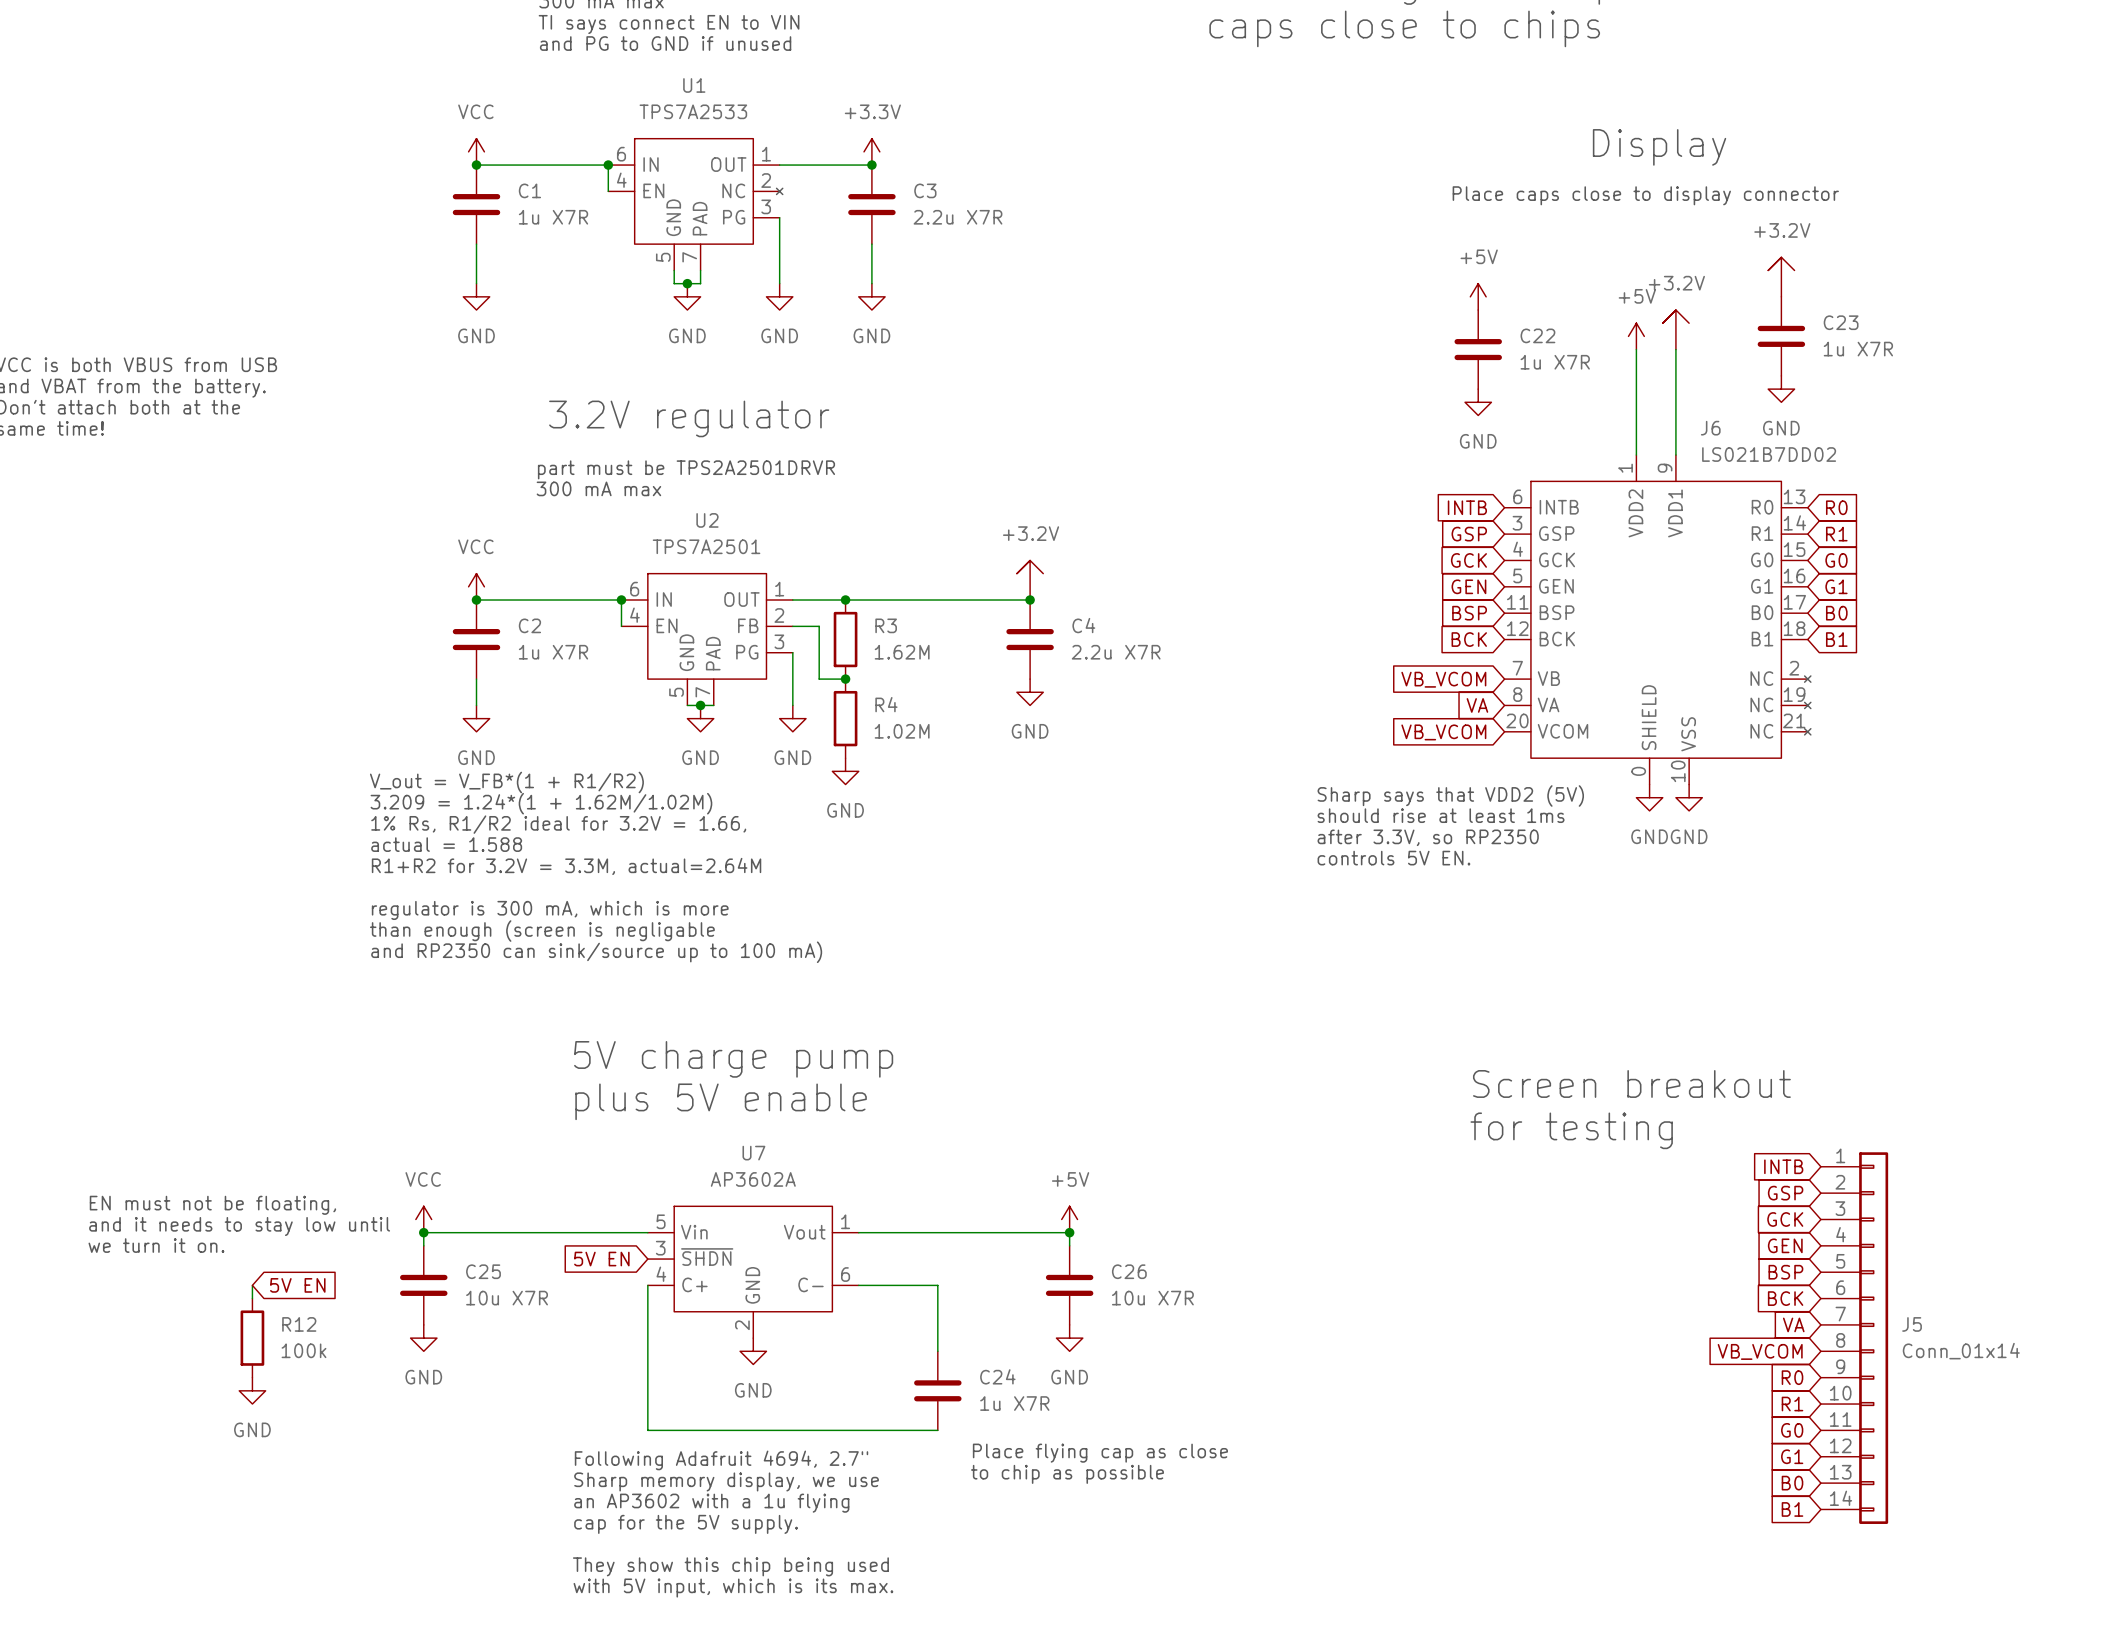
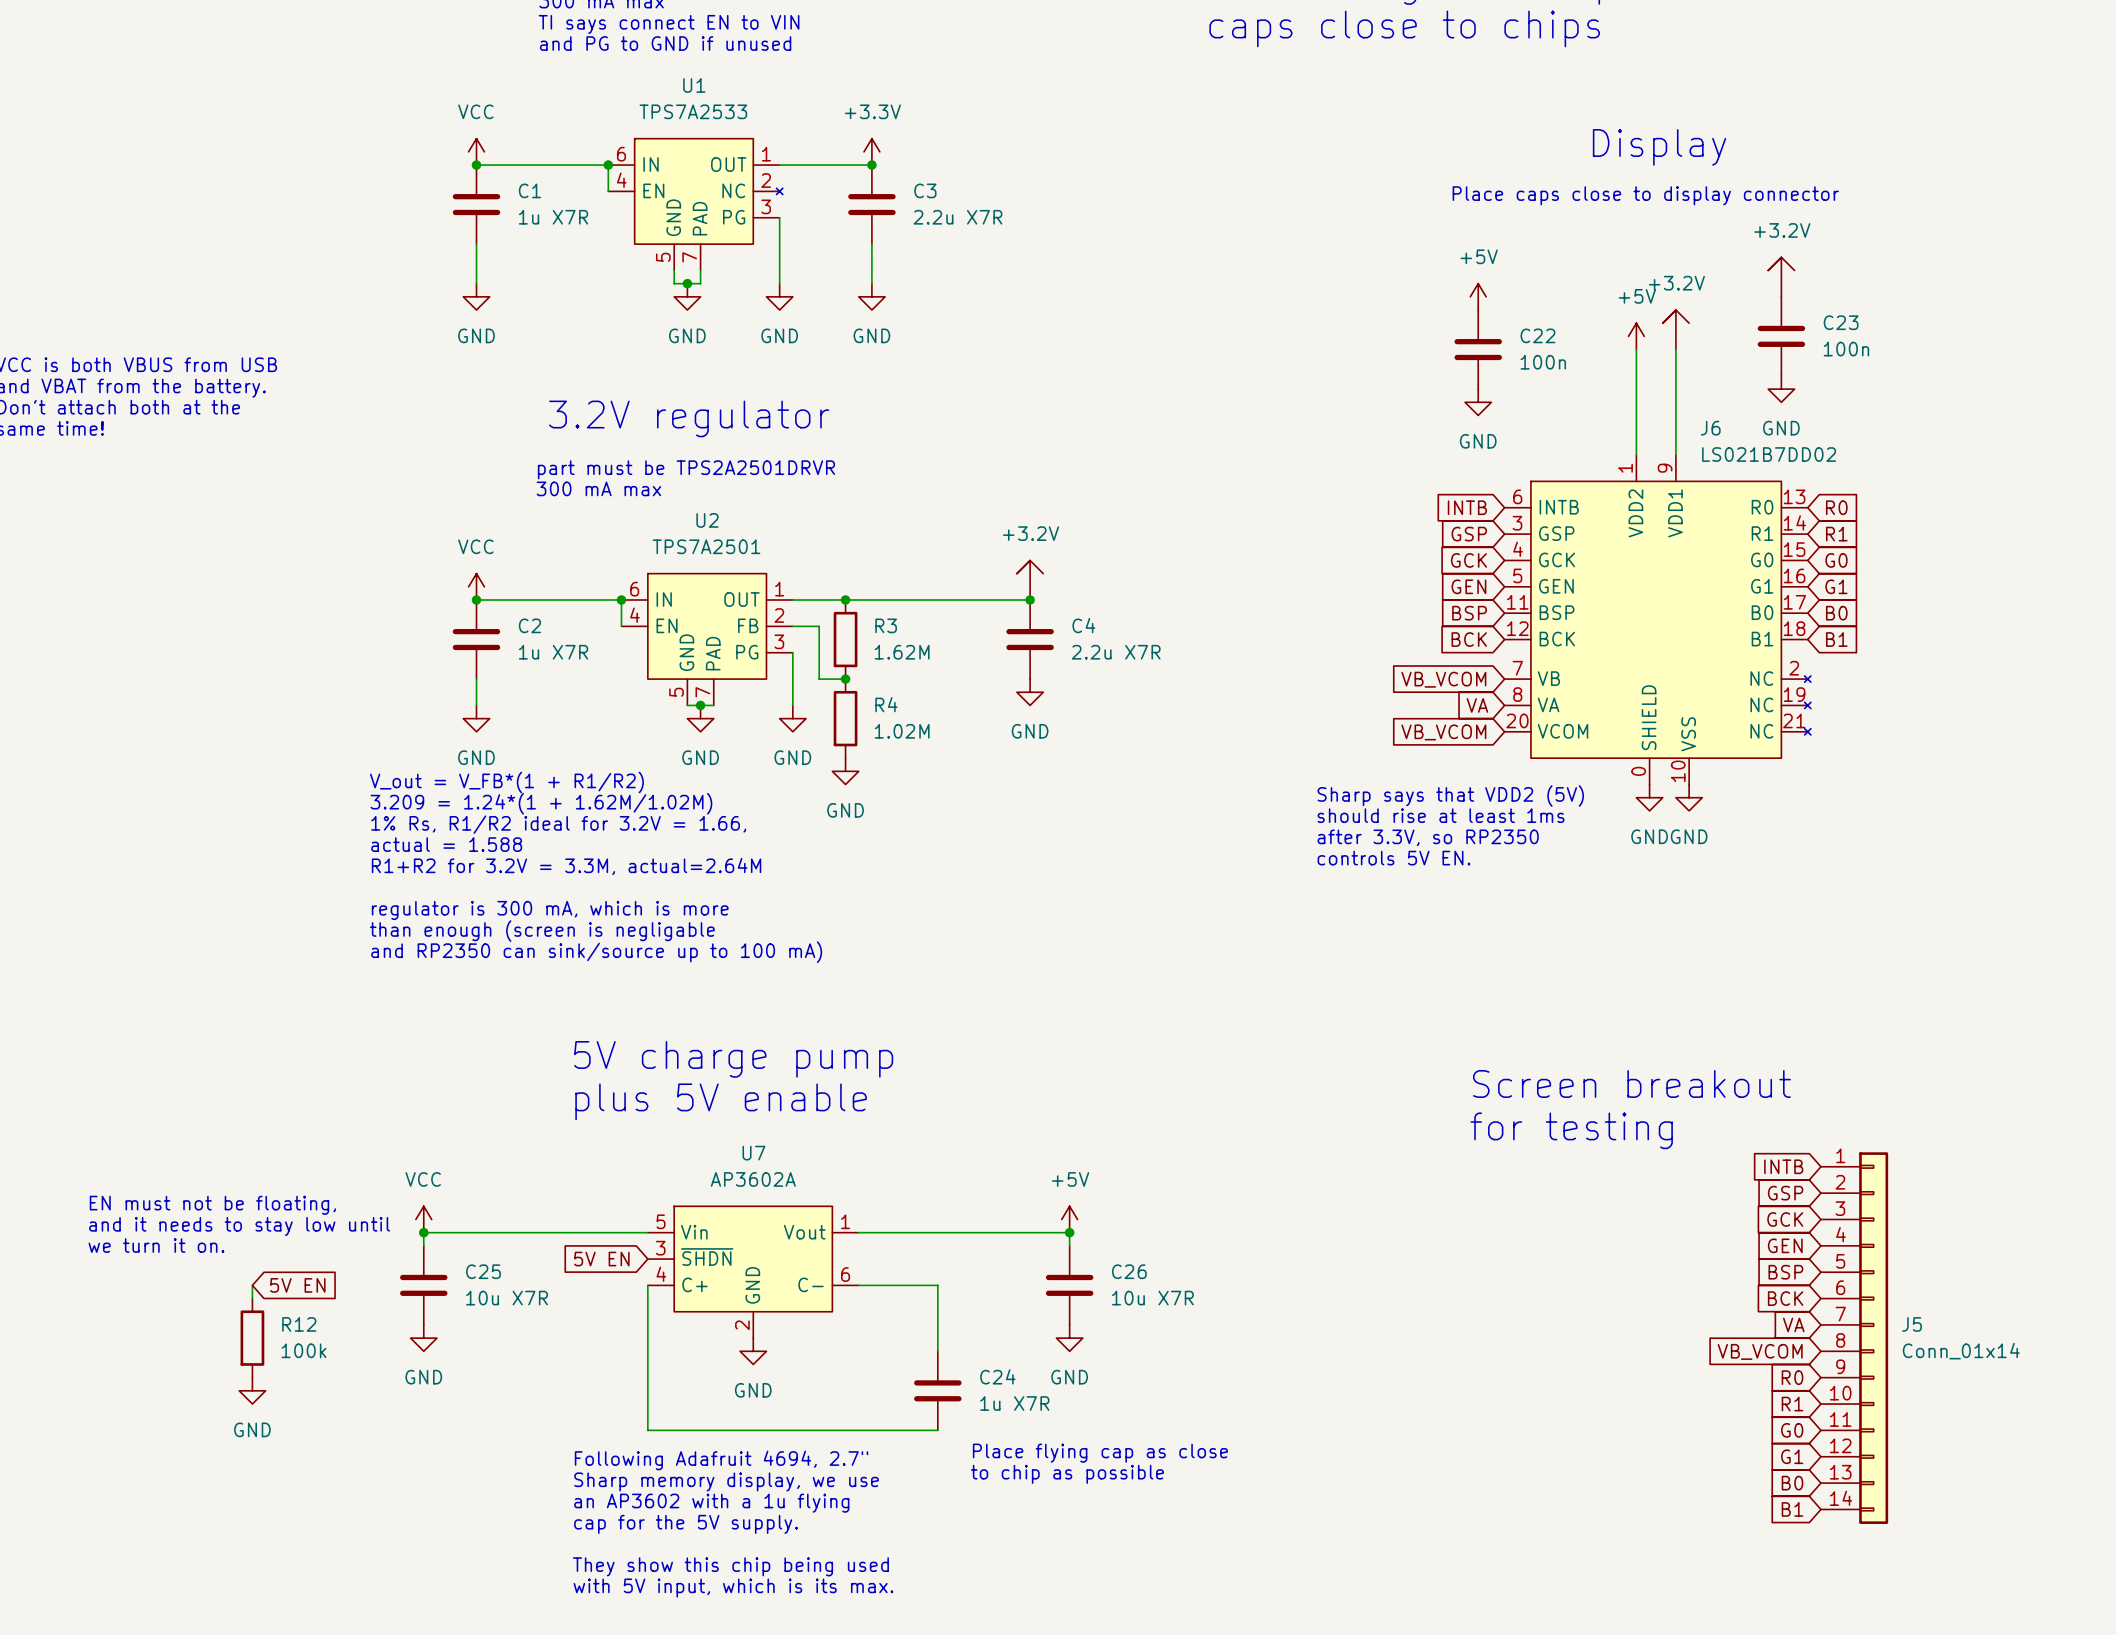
C23 value: 1u X7R (1858, 349) -> 100n (1846, 349)
C22 value: 1u X7R (1555, 362) -> 100n (1543, 362)

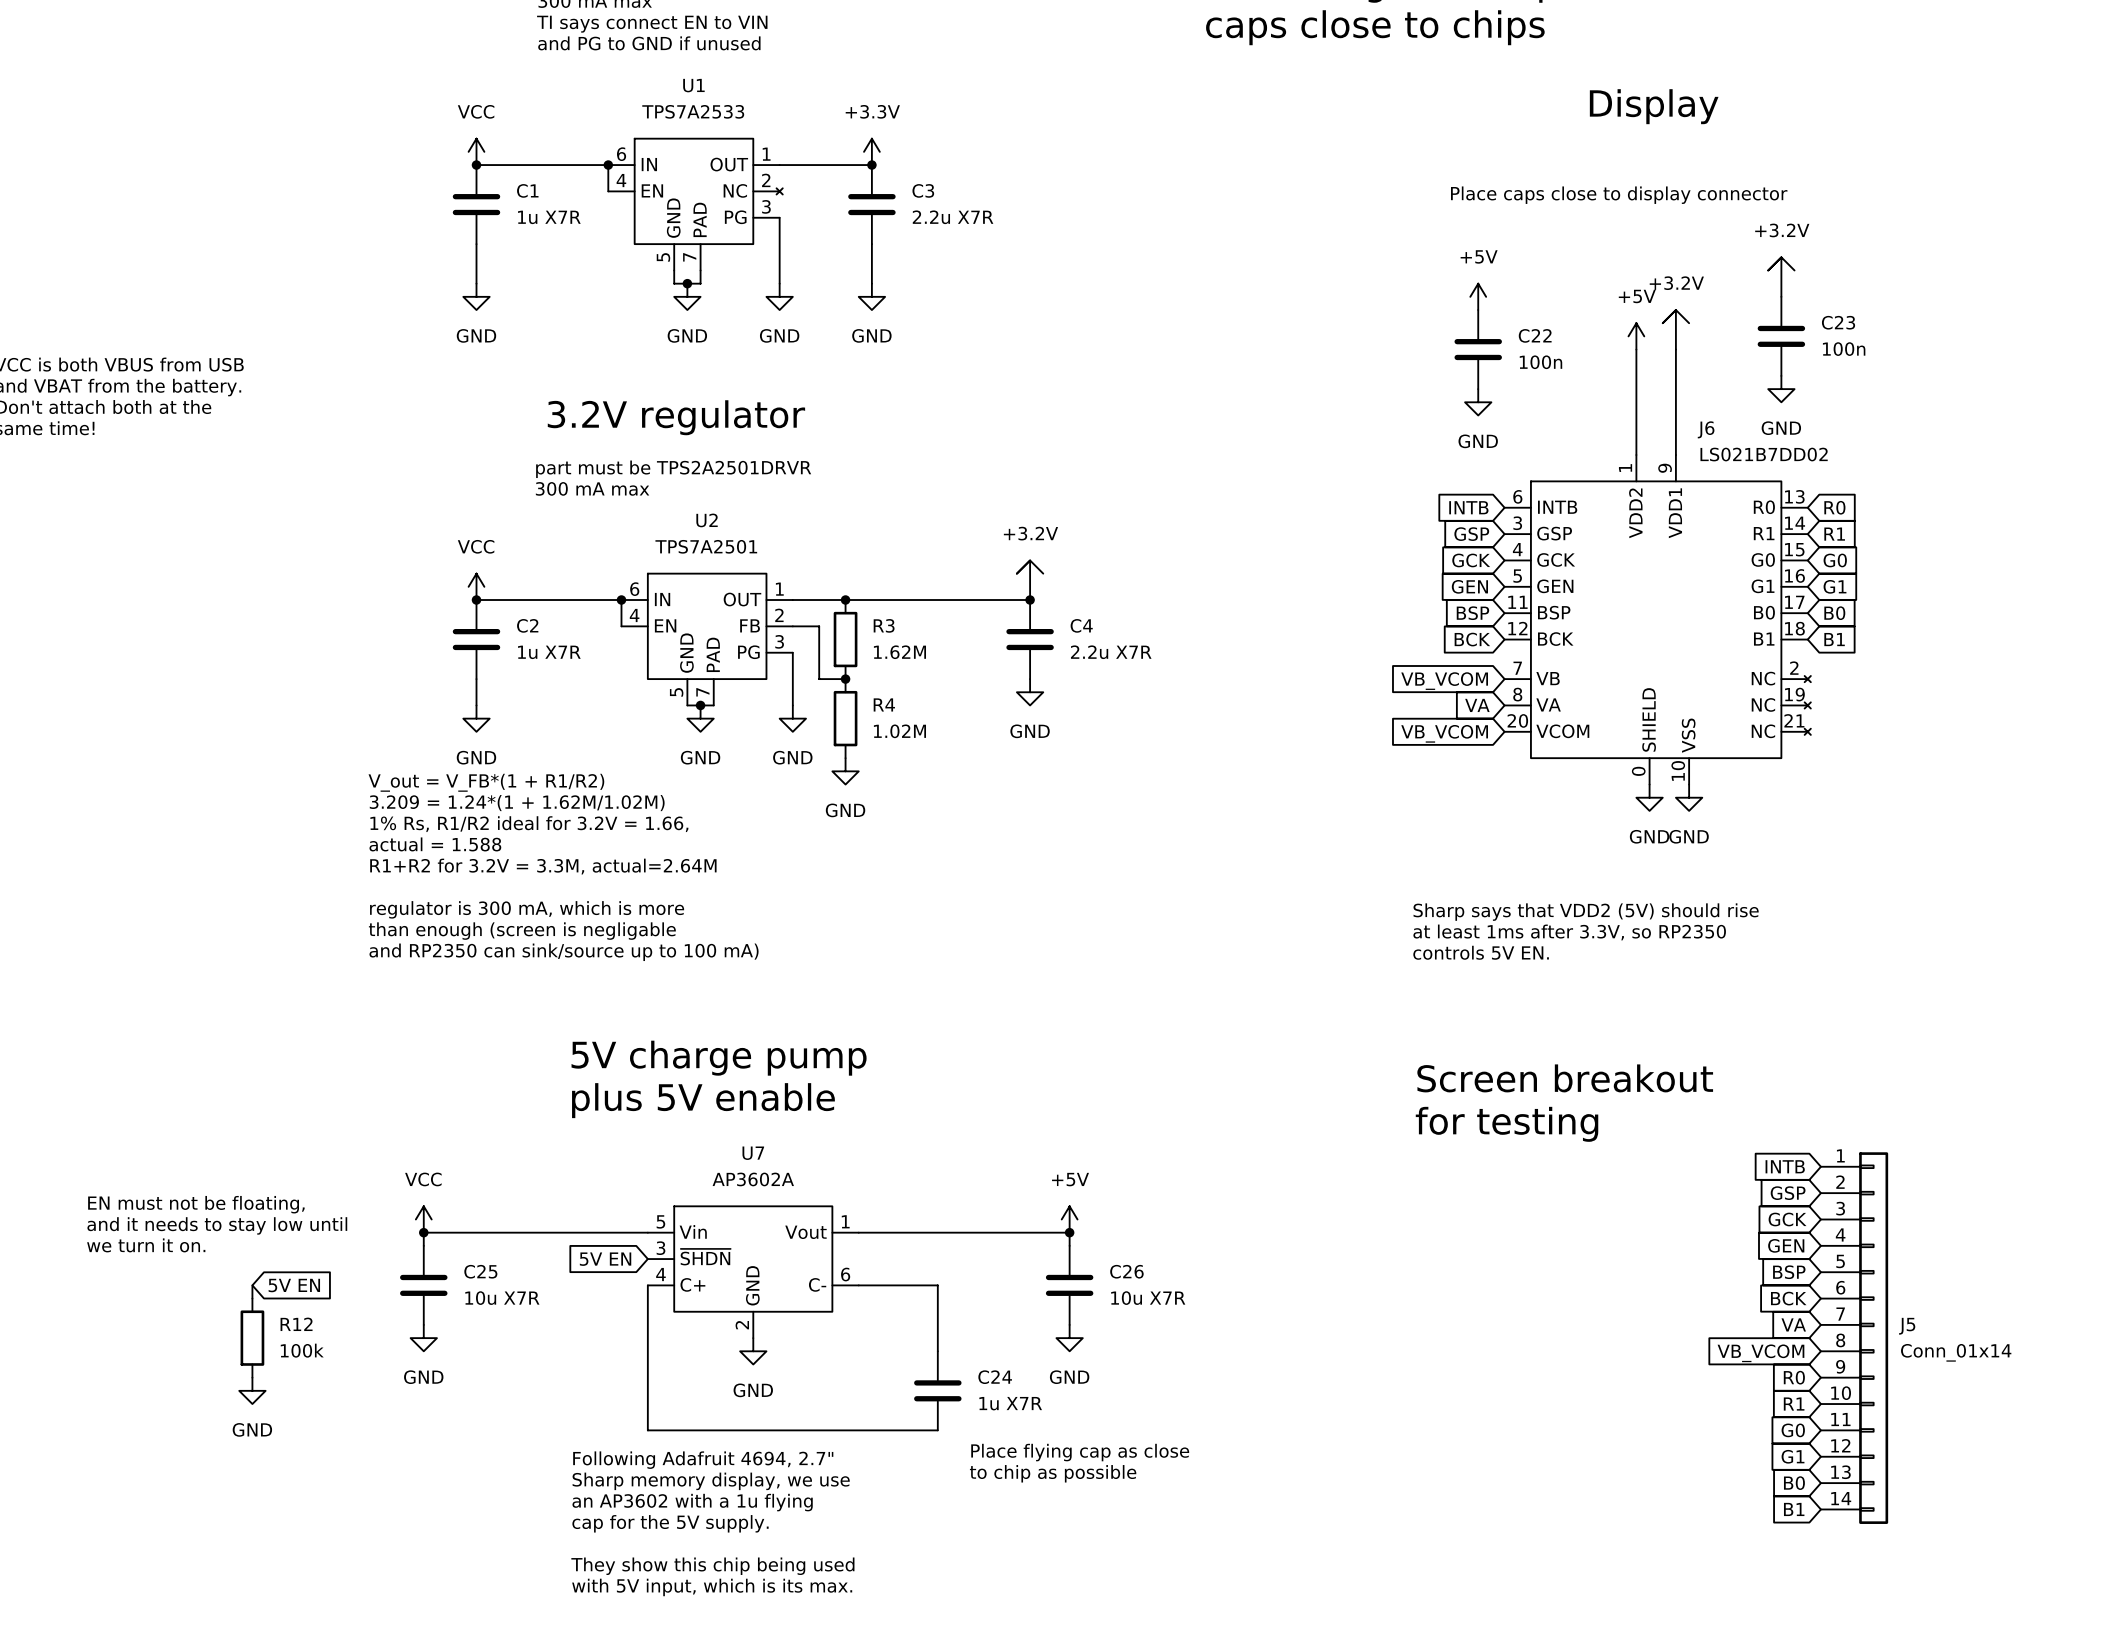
text position: Display (1659, 147) -> Display (1654, 106)
text: Sharp says that VDD2 (5V) (1450, 795) -> none
text: should rise at least 1ms (1441, 815) -> none
text: after 3.3V, so RP2350 (1428, 837) -> none
text position: controls 5V EN. (1393, 858) -> controls 5V EN. (1481, 952)
text: none -> Sharp says that VDD2 (5V) should rise (1586, 912)
text: none -> at least 1ms after 3.3V, so RP2350 (1569, 932)
text position: Screen breakout (1631, 1083) -> Screen breakout (1565, 1078)
text position: for testing (1571, 1130) -> for testing (1507, 1124)

